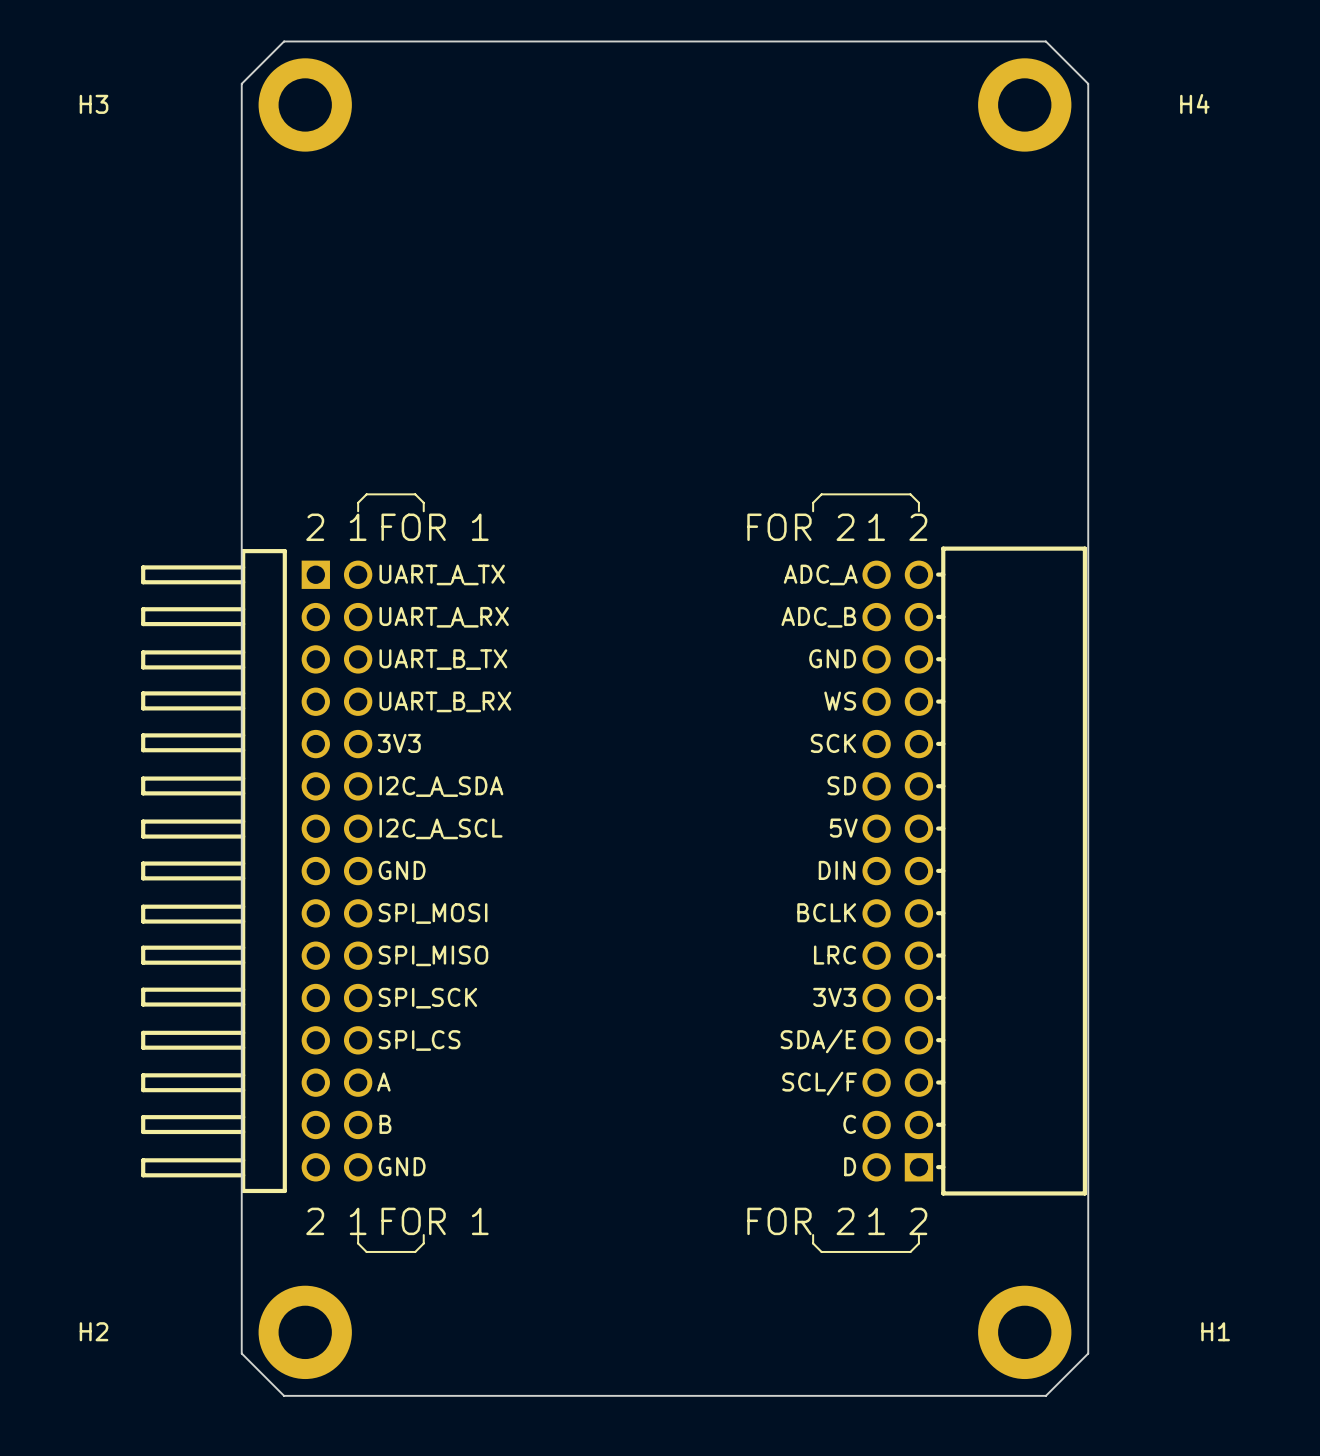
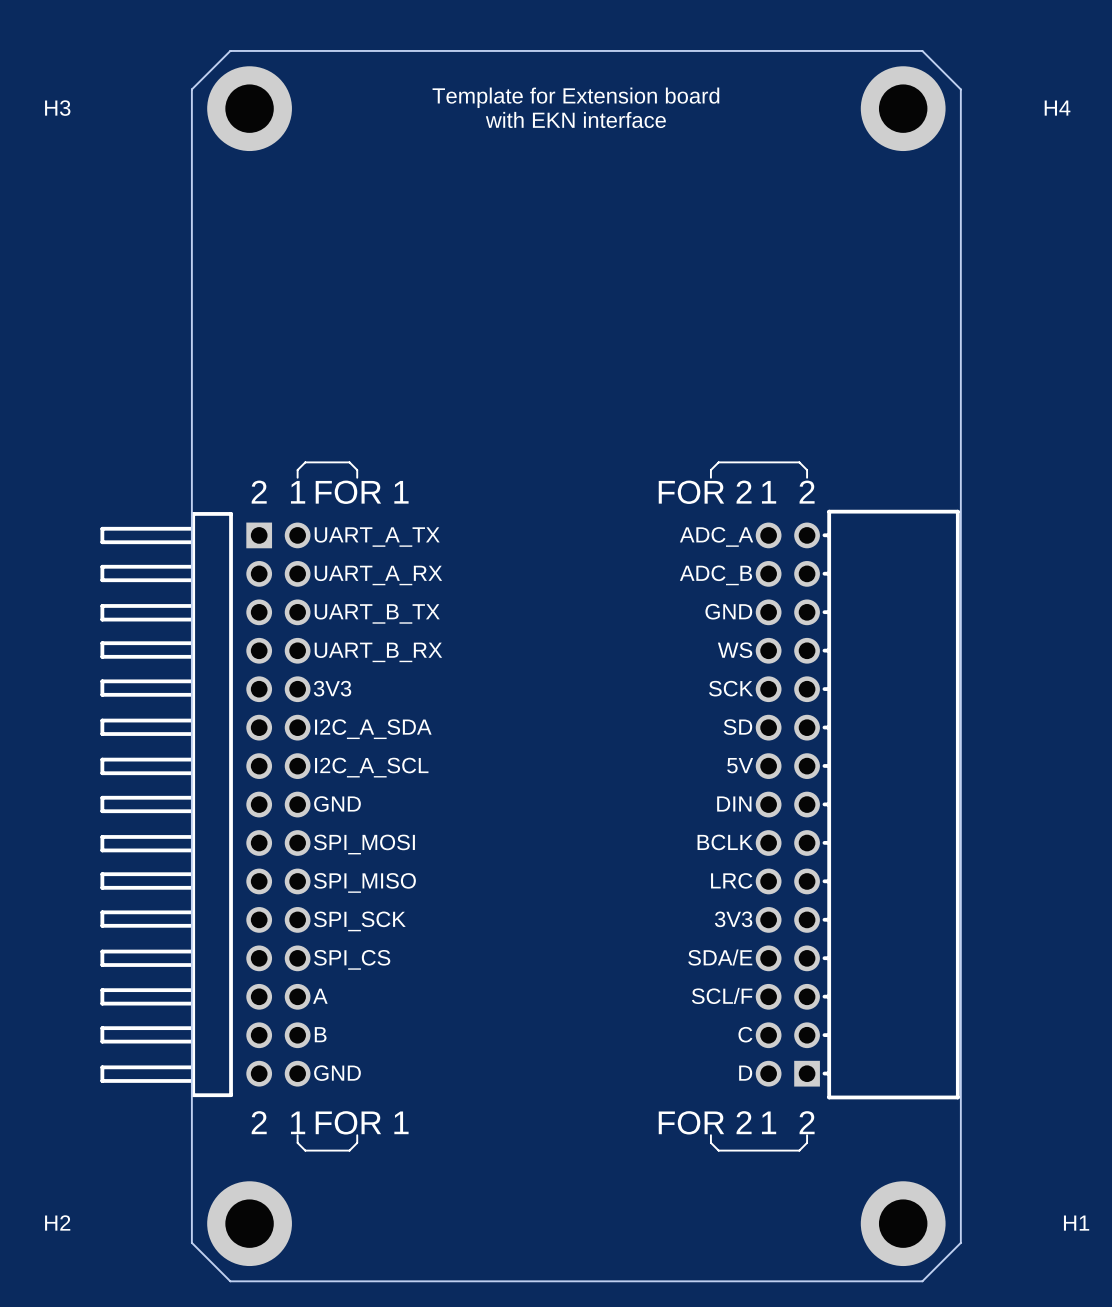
text: none -> Template for Extension board (575, 97)
text: none -> with EKN interface (575, 119)

